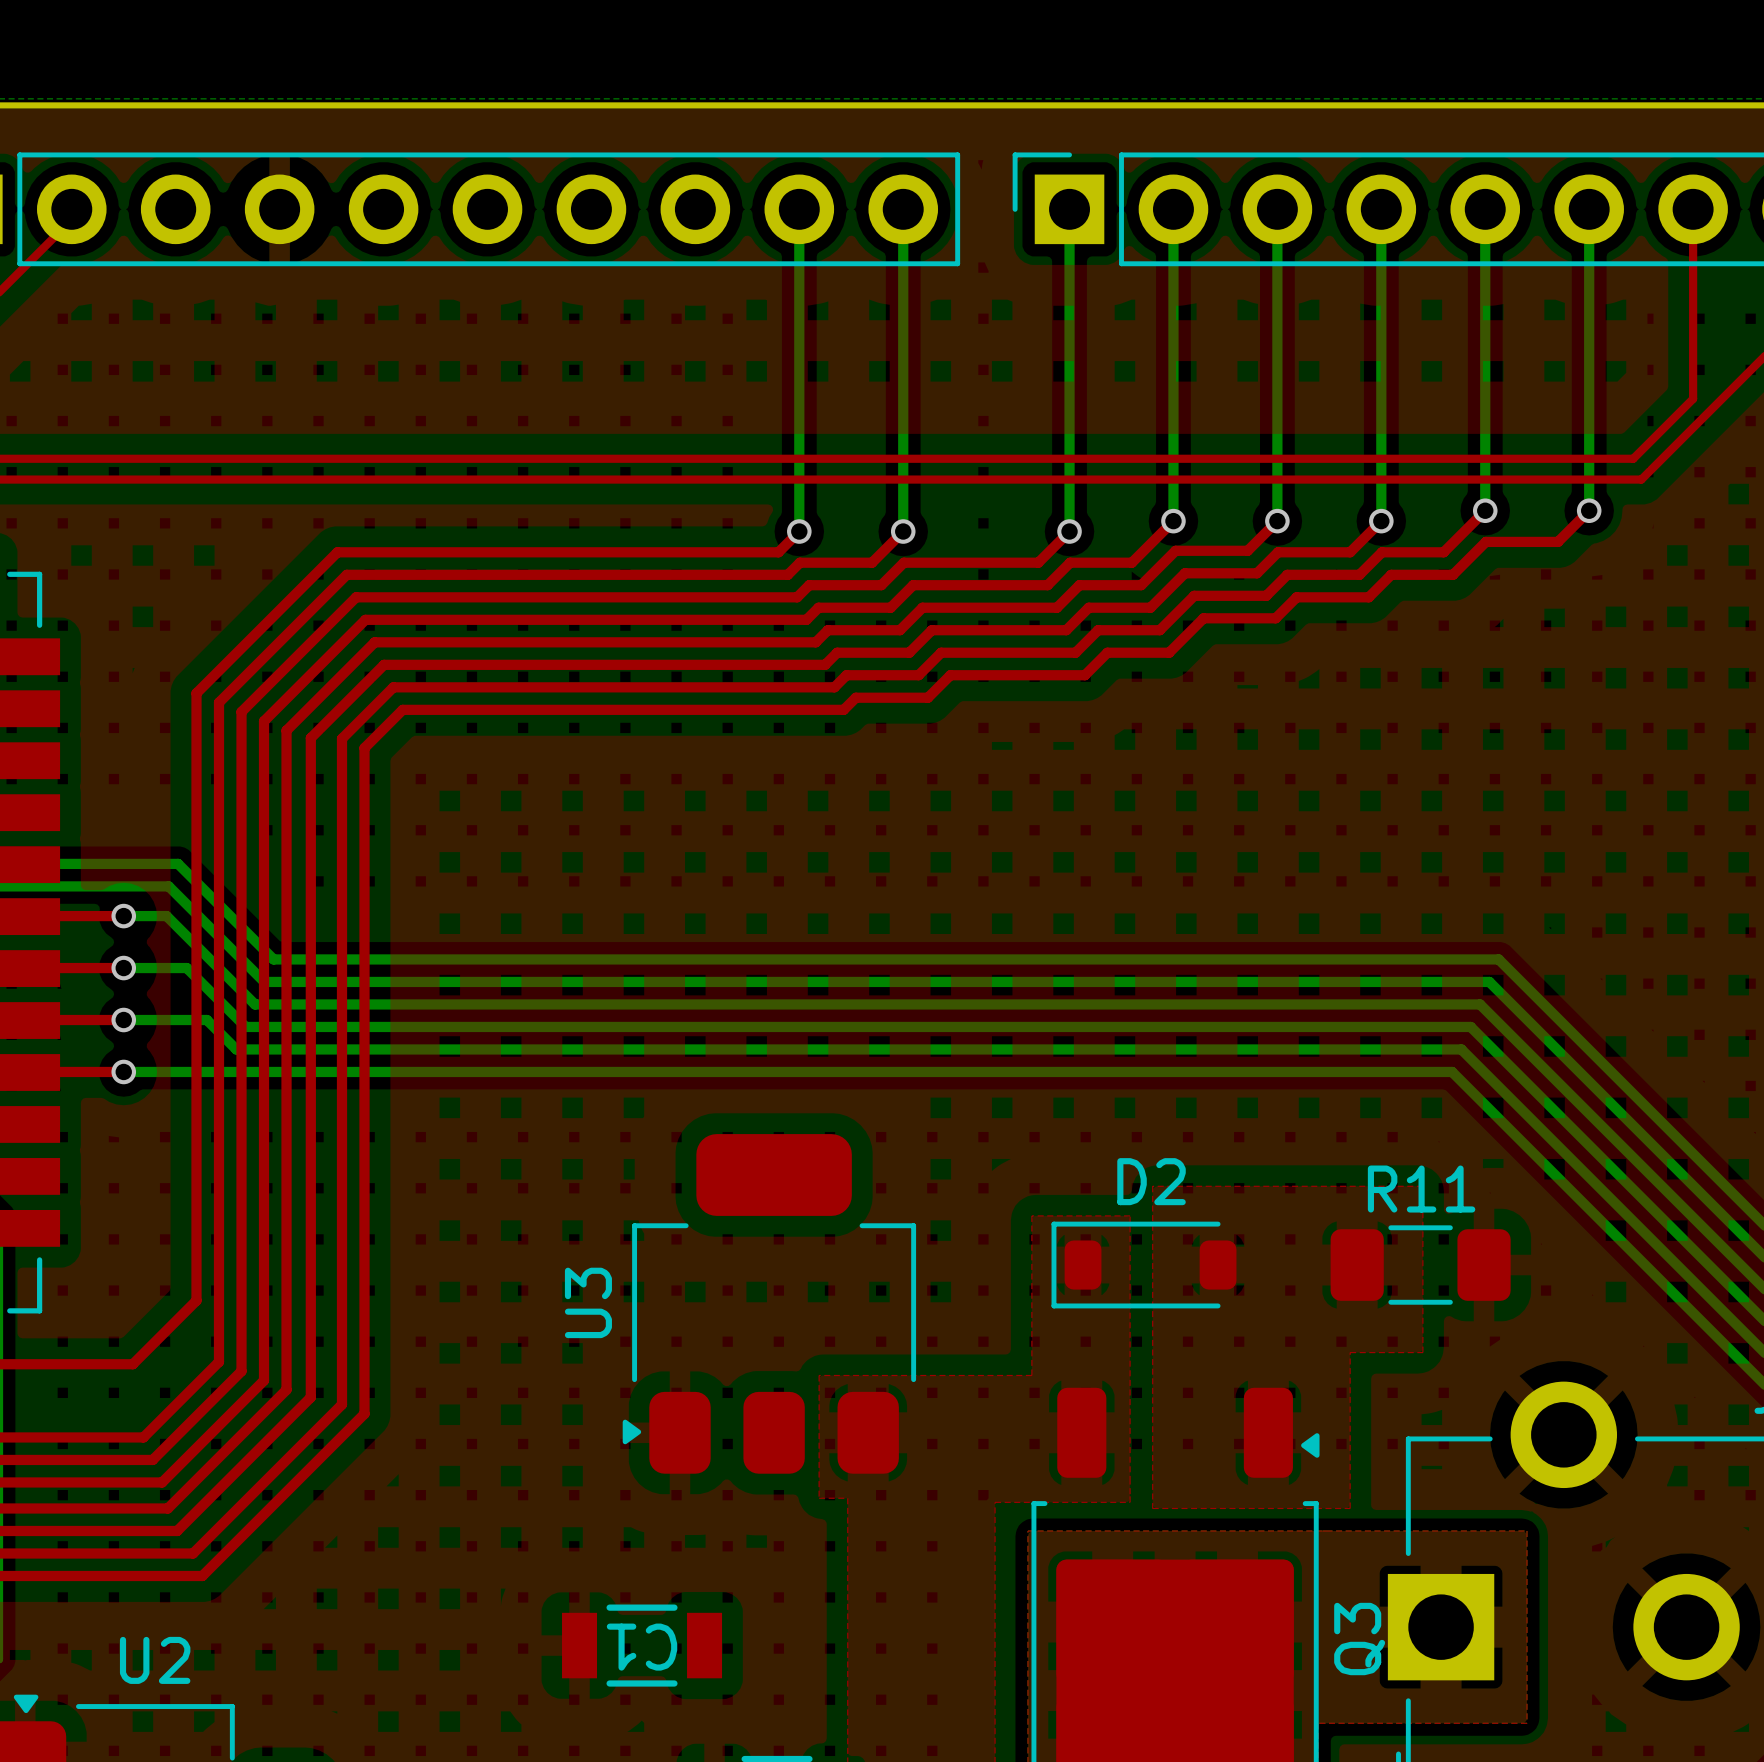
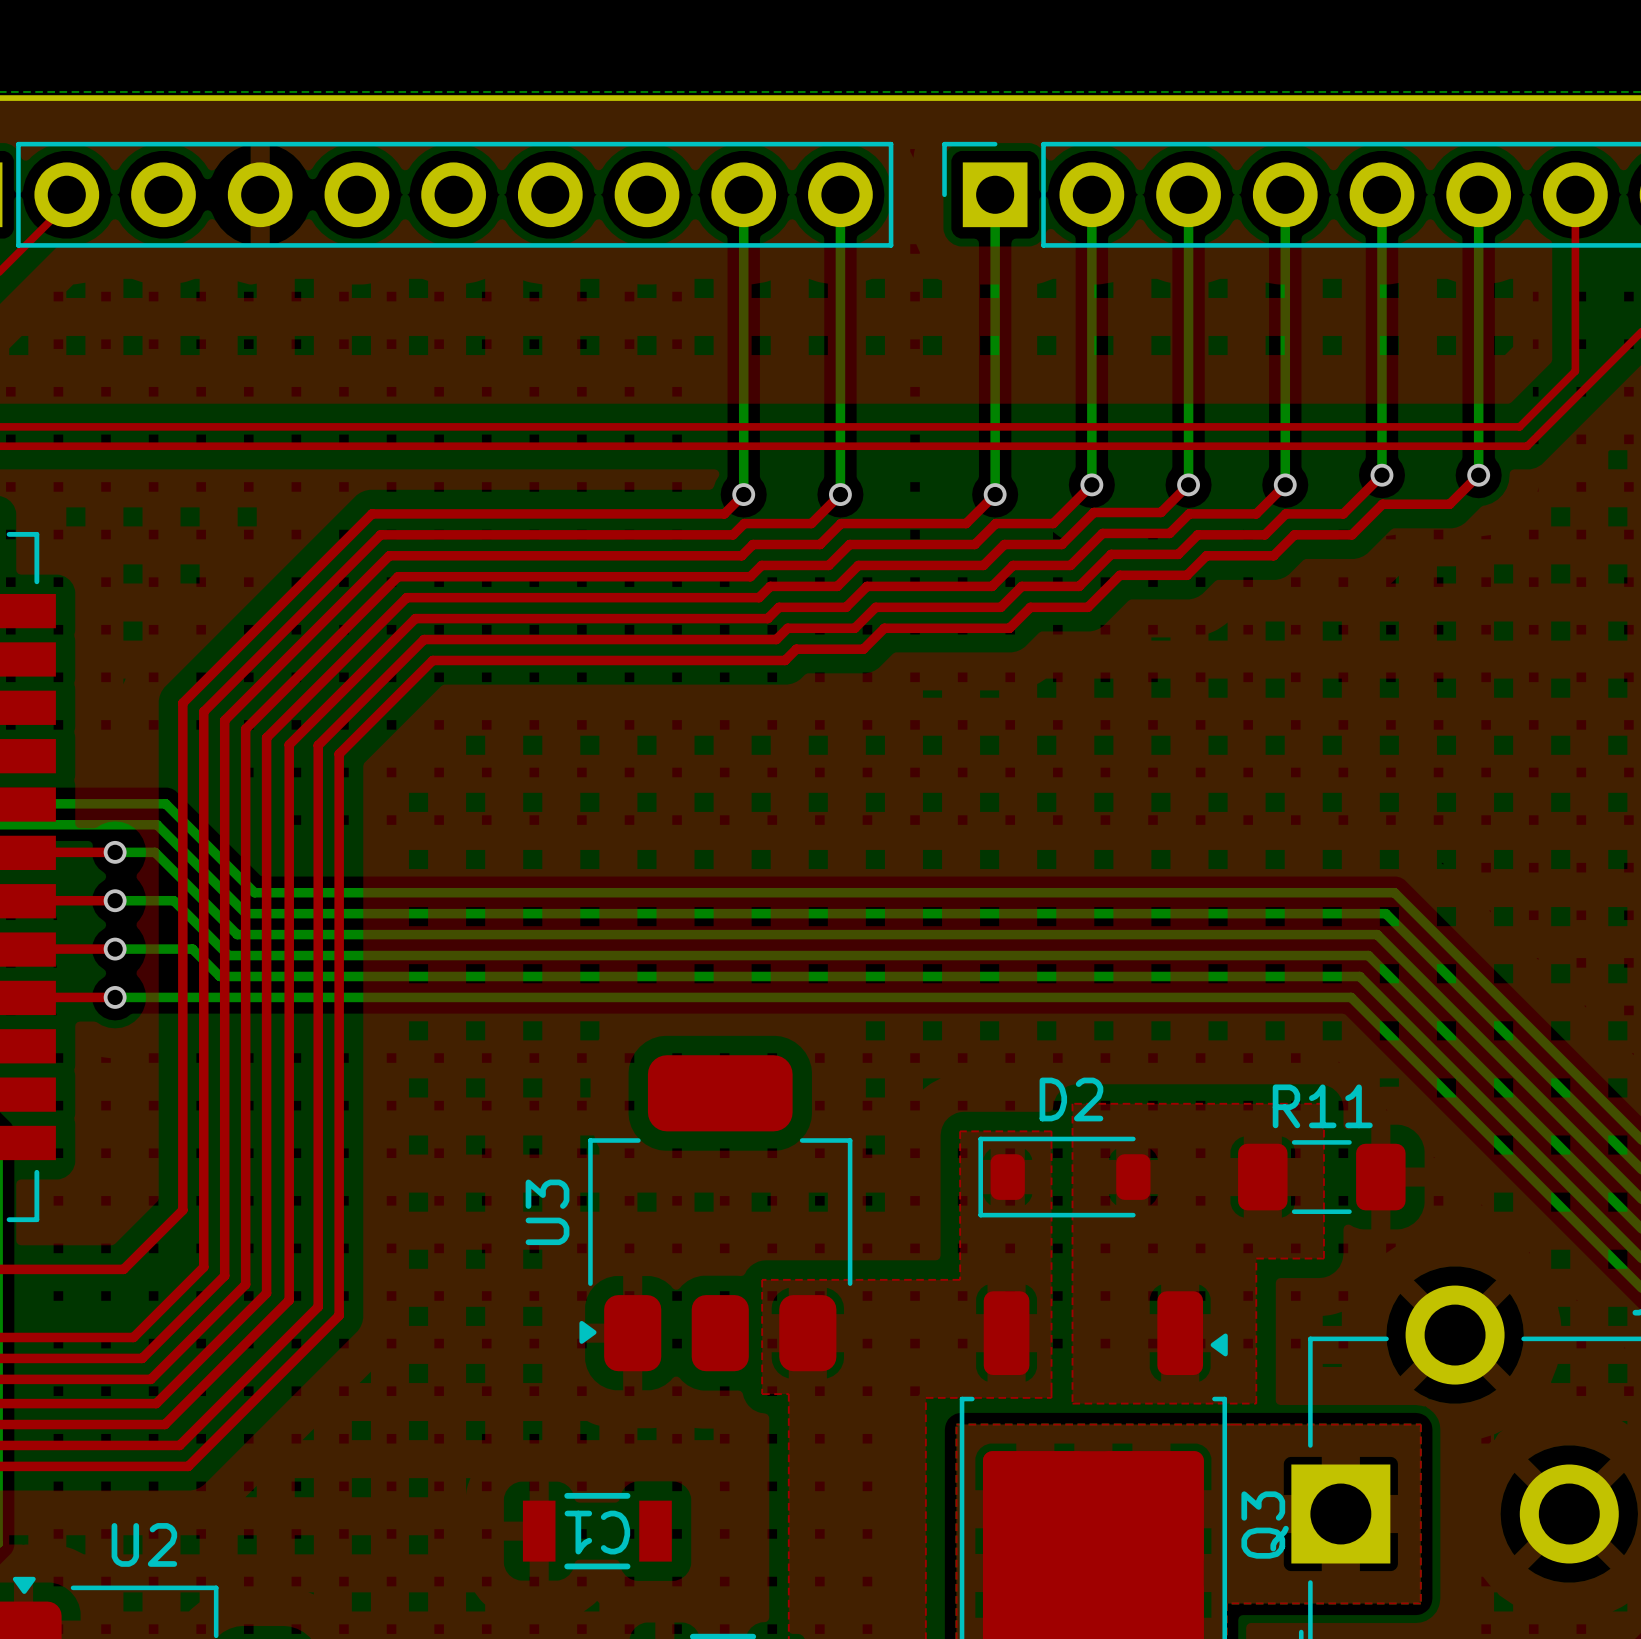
top track: (399, 552) (337, 552) (196, 693) (196, 755) -> (372, 513) (182, 703)
top track: (409, 574) (346, 574) (219, 702) (219, 764) -> (380, 534) (203, 711)
top track: (418, 597) (356, 597) (241, 711) (241, 774) -> (389, 555) (224, 720)
top track: (427, 619) (365, 619) (264, 721) (264, 783) -> (398, 576) (245, 729)
top track: (437, 642) (374, 642) (286, 730) (286, 792) -> (406, 597) (266, 737)
top track: (446, 664) (384, 664) (310, 738) (310, 800) -> (415, 618) (289, 744)
top track: (455, 687) (393, 687) (342, 738) (342, 801) -> (424, 639) (318, 745)
top track: (465, 709) (402, 709) (364, 748) (364, 810) -> (432, 660) (339, 754)

